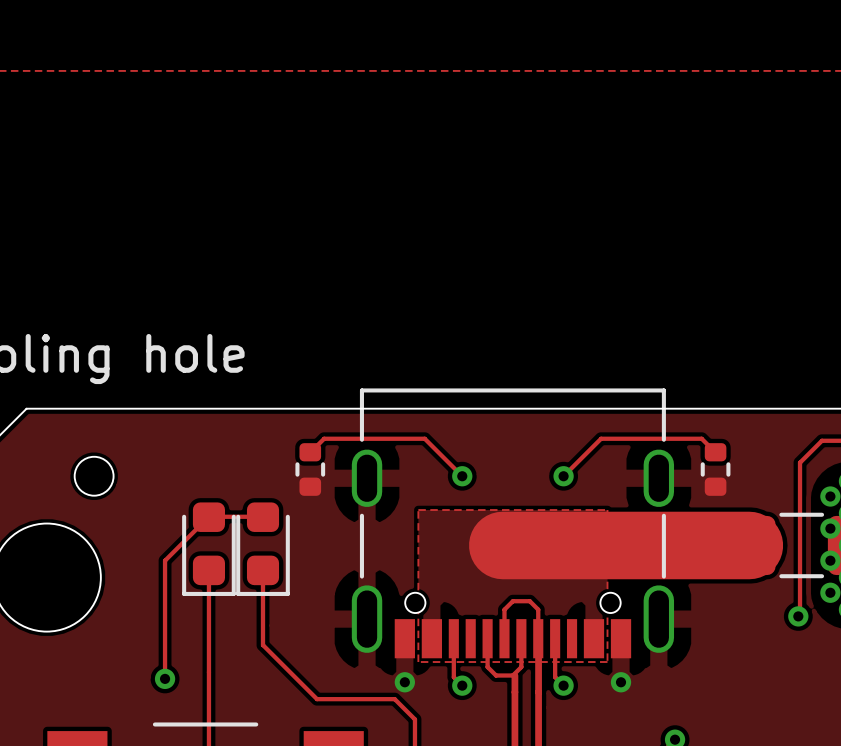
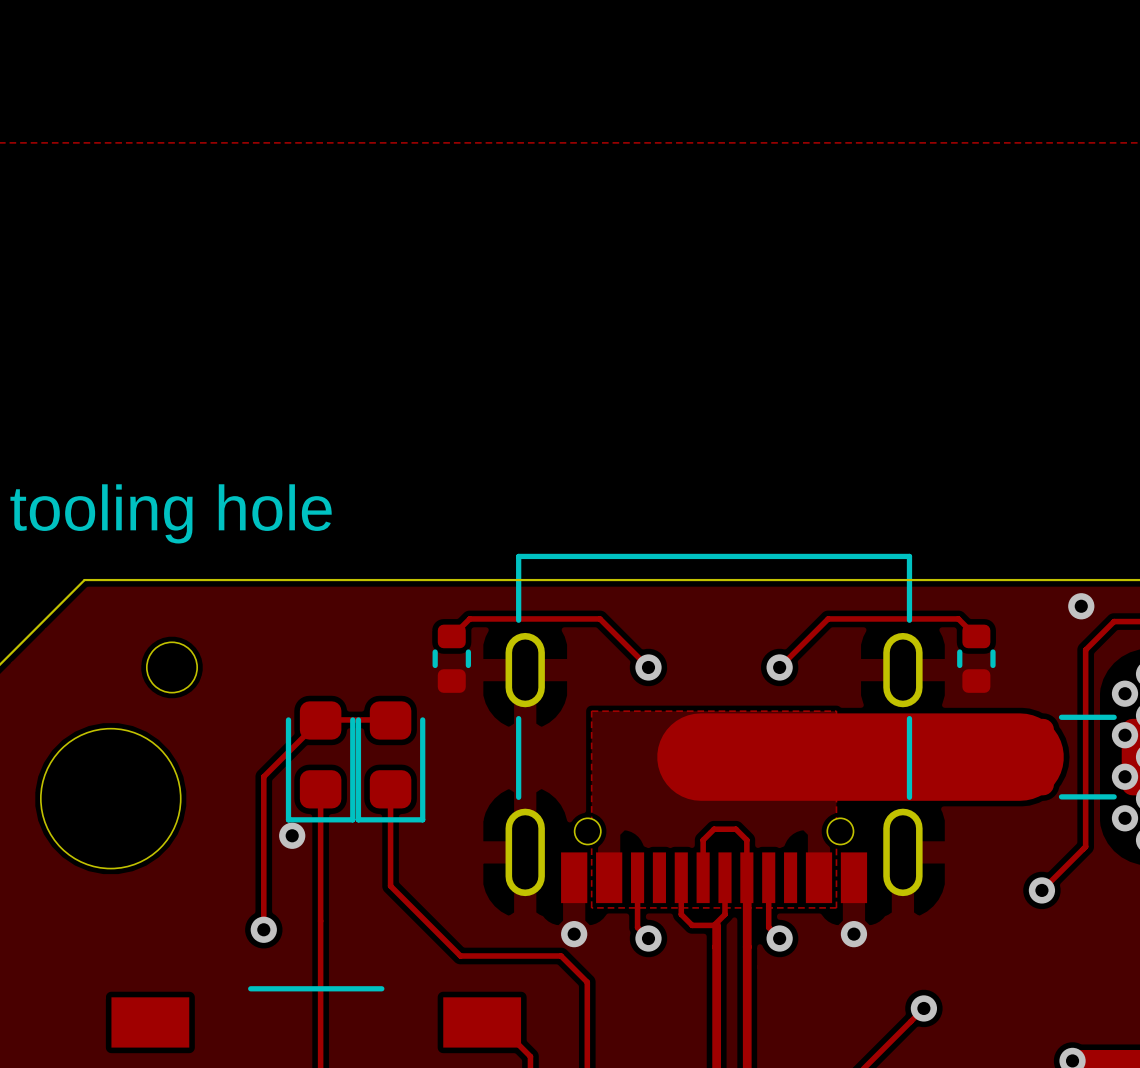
via: none -> (1081, 606)
via: none -> (292, 835)
track: none -> (1083, 848) (1041, 890)
via position: (798, 616) -> (1041, 890)

